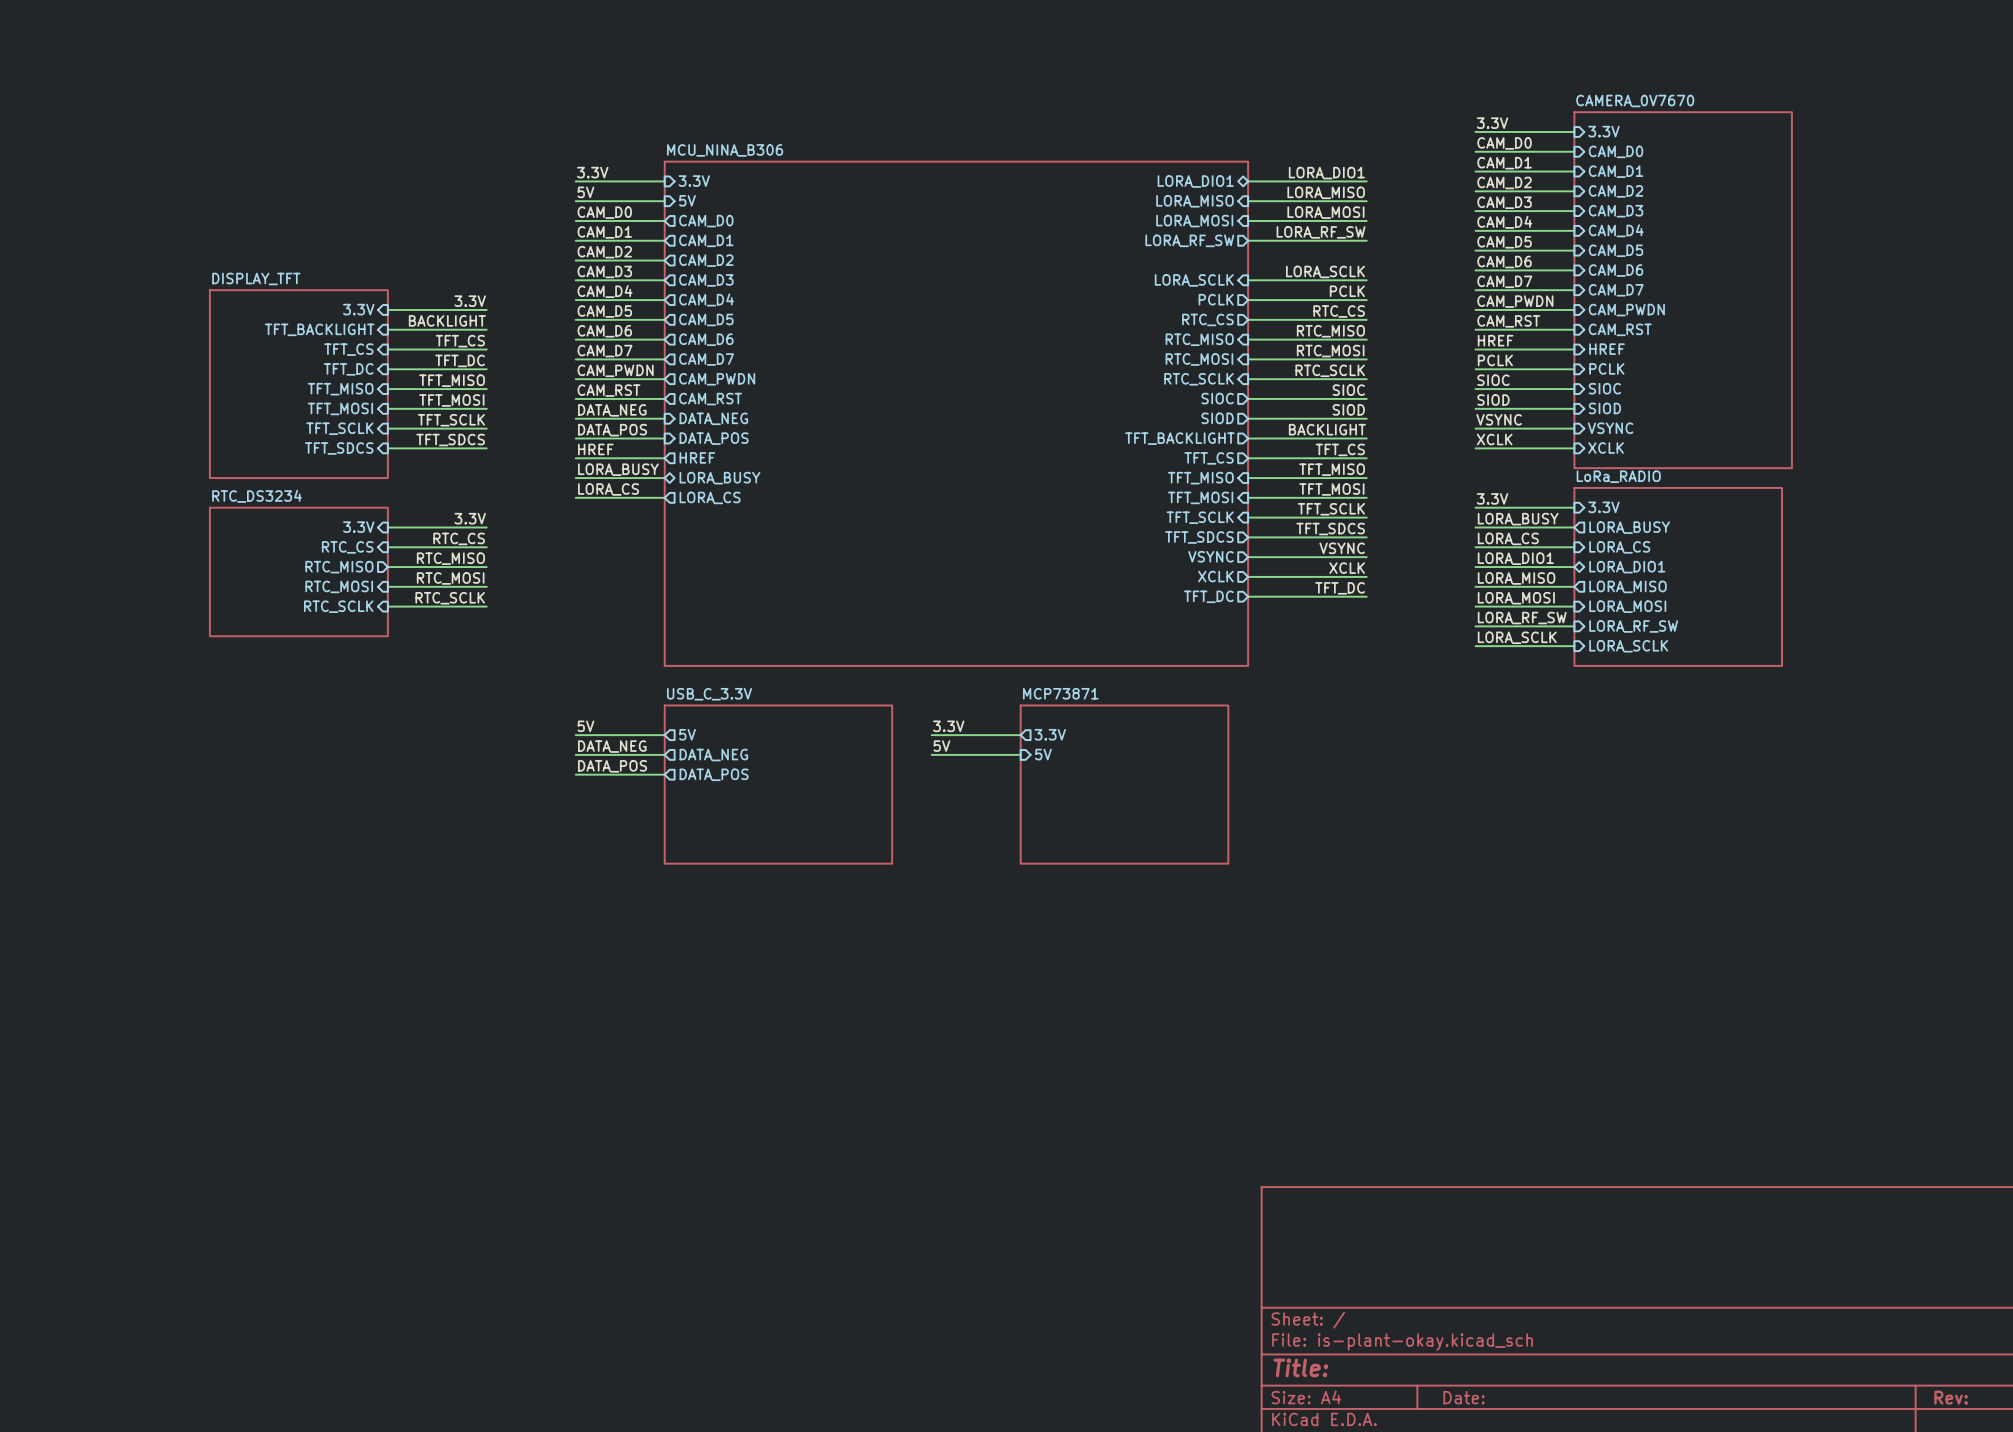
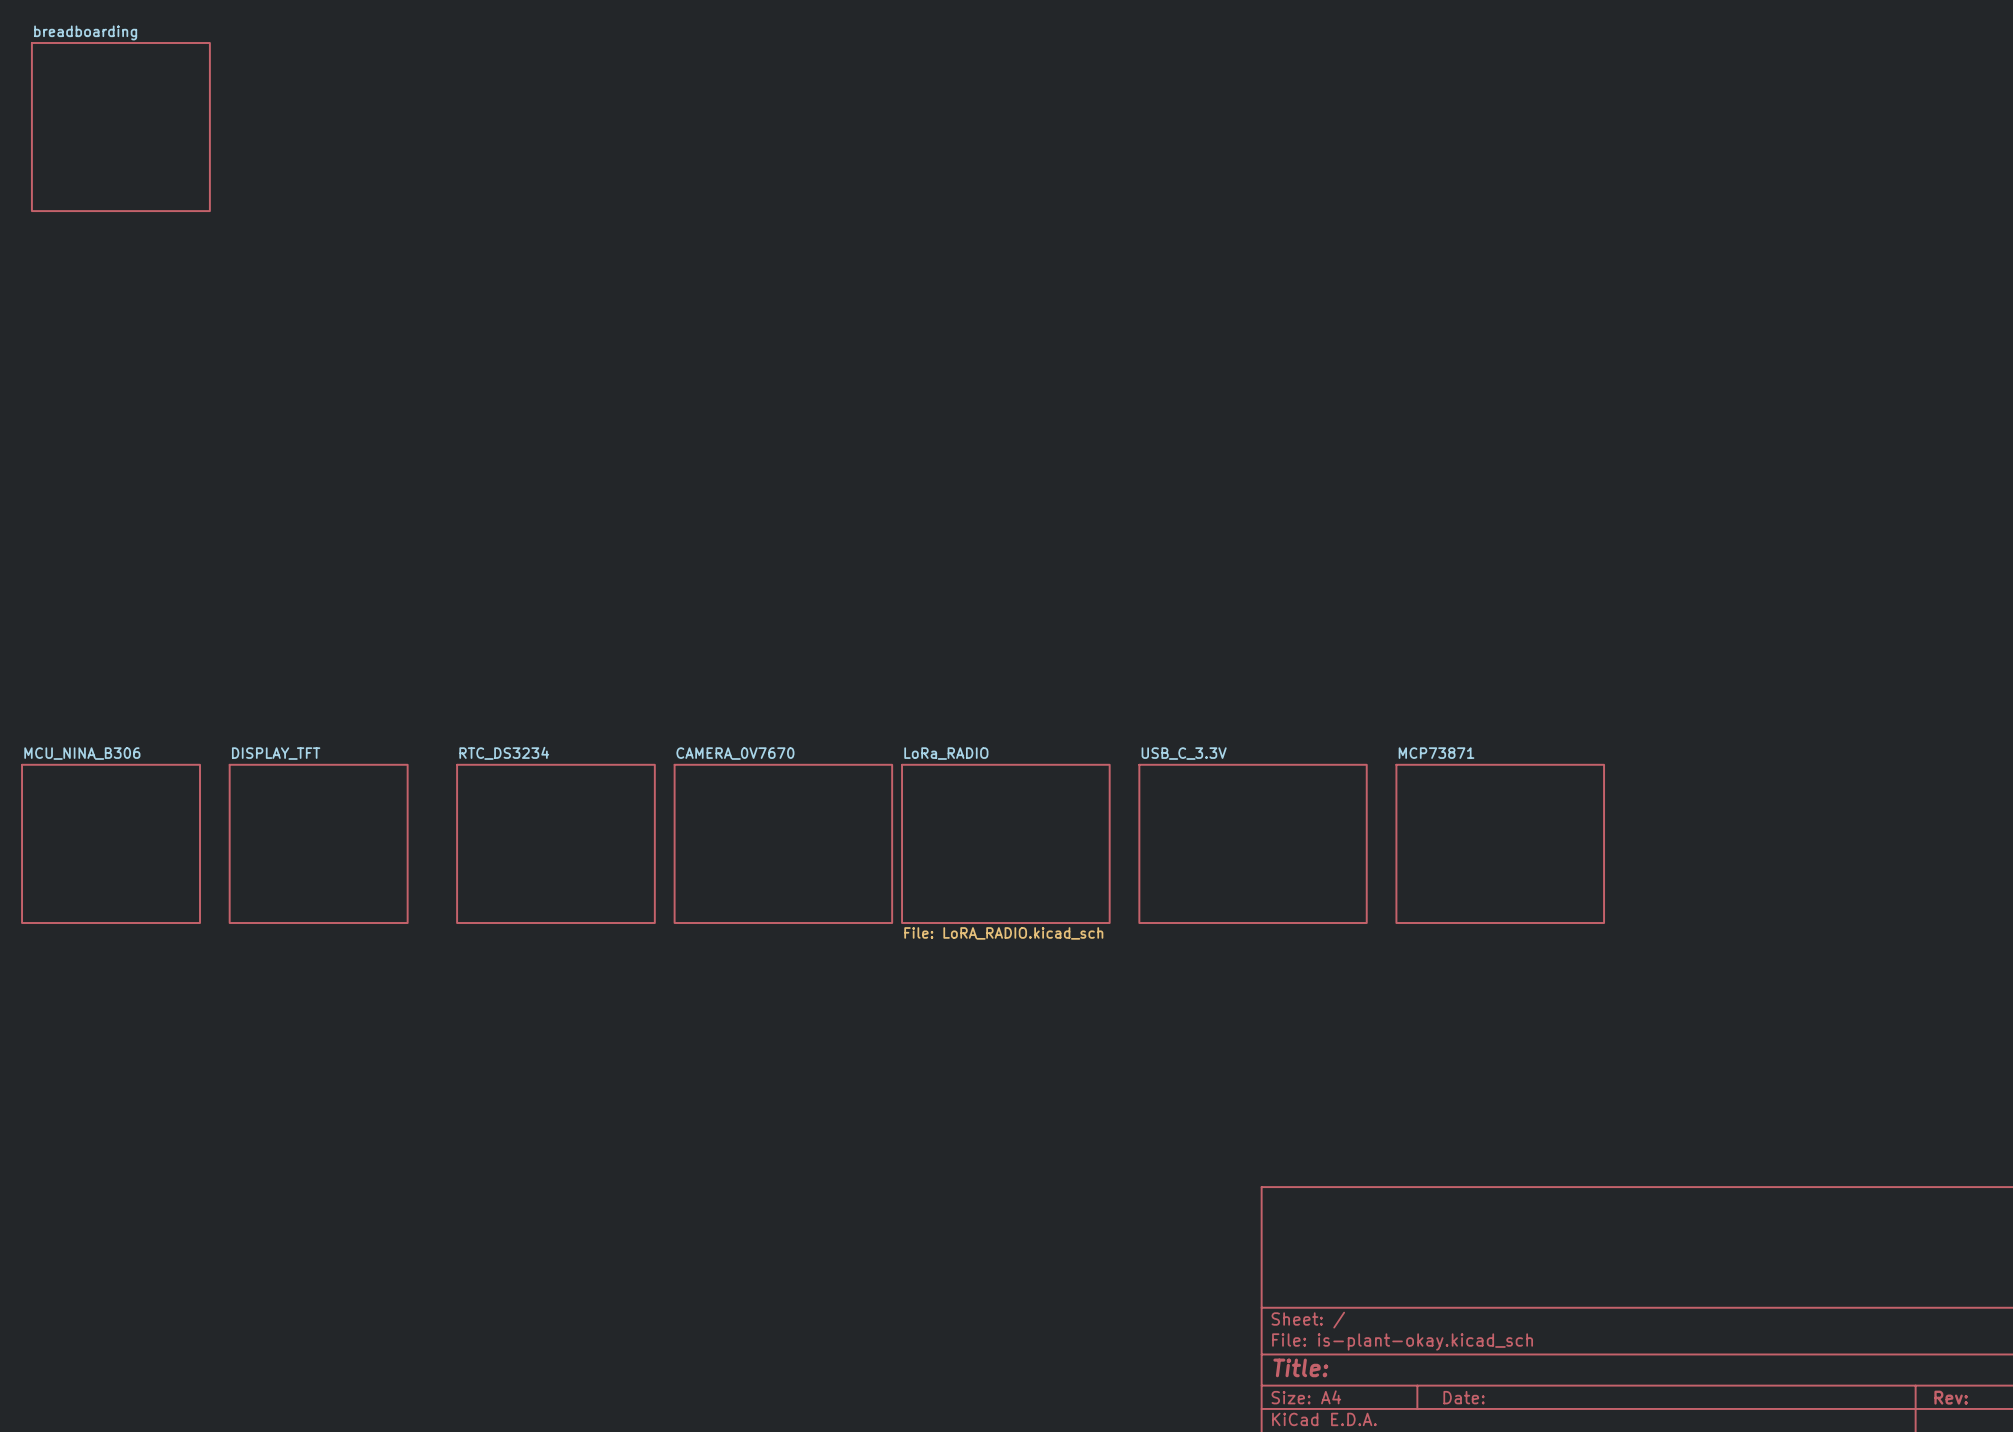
sheet CAMERA_0V7670 name position: CAMERA_0V7670 (1635, 100) -> CAMERA_0V7670 (735, 753)
sheet CAMERA_0V7670 shape: [1573, 111, 1793, 469] -> [674, 764, 893, 924]
label: 3.3V (1492, 123) -> none
sheet breadboarding: none -> (120, 127)
wire: (1475, 131) (1574, 131) -> none
sheet pin: 3.3V (1603, 131) -> none
label: CAM_D0 (1504, 143) -> none
sheet MCU_NINA_B306 name position: MCU_NINA_B306 (725, 150) -> MCU_NINA_B306 (82, 753)
wire: (1475, 151) (1574, 151) -> none
sheet pin: CAM_D0 (1615, 151) -> none
sheet MCU_NINA_B306 shape: [664, 161, 1249, 667] -> [21, 764, 201, 924]
label: CAM_D1 (1504, 163) -> none
wire: (1475, 171) (1574, 171) -> none
sheet pin: CAM_D1 (1615, 171) -> none
label: 3.3V (592, 172) -> none
label: LORA_DIO1 (1326, 173) -> none
wire: (575, 181) (664, 181) -> none
sheet pin: 3.3V (694, 181) -> none
sheet pin: LORA_DIO1 (1195, 181) -> none
wire: (1248, 181) (1366, 181) -> none
label: CAM_D2 (1504, 182) -> none
wire: (1475, 191) (1574, 191) -> none
sheet pin: CAM_D2 (1615, 191) -> none
label: 5V (585, 192) -> none
label: LORA_MISO (1326, 192) -> none
sheet pin: 5V (687, 200) -> none
wire: (575, 201) (664, 201) -> none
sheet pin: LORA_MISO (1194, 201) -> none
wire: (1248, 201) (1366, 201) -> none
label: CAM_D3 (1504, 202) -> none
wire: (1475, 211) (1574, 211) -> none
sheet pin: CAM_D3 (1615, 211) -> none
label: CAM_D0 (604, 212) -> none
label: LORA_MOSI (1325, 212) -> none
wire: (575, 220) (664, 220) -> none
wire: (1248, 220) (1366, 220) -> none
sheet pin: CAM_D0 (706, 221) -> none
sheet pin: LORA_MOSI (1194, 221) -> none
label: CAM_D4 (1504, 222) -> none
wire: (1475, 230) (1574, 230) -> none
sheet pin: CAM_D4 (1616, 230) -> none
label: CAM_D1 (604, 232) -> none
label: LORA_RF_SW (1321, 232) -> none
wire: (575, 240) (664, 240) -> none
sheet pin: CAM_D1 (706, 240) -> none
sheet pin: LORA_RF_SW (1189, 240) -> none
wire: (1248, 240) (1366, 240) -> none
label: CAM_D5 (1504, 242) -> none
wire: (1475, 250) (1574, 250) -> none
sheet pin: CAM_D5 (1615, 250) -> none
label: CAM_D2 (604, 252) -> none
wire: (575, 260) (664, 260) -> none
sheet pin: CAM_D2 (706, 260) -> none
label: CAM_D6 (1504, 262) -> none
wire: (1475, 270) (1574, 270) -> none
sheet pin: CAM_D6 (1615, 270) -> none
label: CAM_D3 (604, 271) -> none
label: LORA_SCLK (1325, 271) -> none
wire: (575, 280) (664, 280) -> none
sheet pin: CAM_D3 (706, 280) -> none
sheet pin: LORA_SCLK (1194, 280) -> none
wire: (1248, 280) (1366, 280) -> none
label: CAM_D7 (1504, 281) -> none
wire: (1475, 290) (1574, 290) -> none
sheet pin: CAM_D7 (1616, 290) -> none
label: CAM_D4 (605, 291) -> none
label: PCLK (1347, 291) -> none
sheet pin: CAM_D4 (706, 299) -> none
sheet pin: PCLK (1216, 299) -> none
wire: (575, 300) (664, 300) -> none
wire: (1248, 300) (1366, 300) -> none
label: 3.3V (470, 301) -> none
label: CAM_PWDN (1515, 301) -> none
sheet pin: 3.3V (358, 309) -> none
wire: (387, 309) (486, 309) -> none
wire: (1475, 309) (1574, 309) -> none
sheet pin: CAM_PWDN (1626, 310) -> none
label: CAM_D5 (604, 311) -> none
label: RTC_CS (1339, 311) -> none
wire: (575, 319) (664, 319) -> none
sheet pin: CAM_D5 (706, 319) -> none
sheet pin: RTC_CS (1207, 319) -> none
wire: (1248, 319) (1366, 319) -> none
label: BACKLIGHT (447, 320) -> none
label: CAM_RST (1508, 321) -> none
sheet pin: TFT_BACKLIGHT (319, 329) -> none
wire: (387, 329) (486, 329) -> none
wire: (1475, 329) (1574, 329) -> none
sheet pin: CAM_RST (1620, 329) -> none
label: CAM_D6 (604, 331) -> none
label: RTC_MISO (1330, 331) -> none
wire: (575, 339) (664, 339) -> none
sheet pin: CAM_D6 (706, 339) -> none
sheet pin: RTC_MISO (1199, 339) -> none
wire: (1248, 339) (1366, 339) -> none
label: HREF (1495, 340) -> none
label: TFT_CS (460, 341) -> none
sheet pin: TFT_CS (348, 349) -> none
wire: (387, 349) (486, 349) -> none
wire: (1475, 349) (1574, 349) -> none
sheet pin: HREF (1607, 349) -> none
label: CAM_D7 (605, 351) -> none
label: RTC_MOSI (1330, 351) -> none
wire: (575, 359) (664, 359) -> none
sheet pin: CAM_D7 (706, 359) -> none
sheet pin: RTC_MOSI (1199, 359) -> none
wire: (1248, 359) (1366, 359) -> none
label: TFT_DC (460, 360) -> none
label: PCLK (1495, 360) -> none
sheet pin: PCLK (1606, 368) -> none
sheet pin: TFT_DC (348, 369) -> none
wire: (387, 369) (486, 369) -> none
wire: (1475, 369) (1574, 369) -> none
label: CAM_PWDN (615, 370) -> none
label: RTC_SCLK (1330, 370) -> none
wire: (575, 379) (664, 379) -> none
sheet pin: CAM_PWDN (717, 379) -> none
sheet pin: RTC_SCLK (1198, 379) -> none
wire: (1248, 379) (1366, 379) -> none
label: TFT_MISO (452, 380) -> none
label: SIOC (1493, 380) -> none
sheet DISPLAY_TFT: (298, 384) -> none
sheet pin: SIOC (1604, 388) -> none
sheet pin: TFT_MISO (340, 389) -> none
wire: (387, 389) (486, 389) -> none
wire: (1475, 389) (1574, 389) -> none
label: CAM_RST (609, 390) -> none
label: SIOC (1348, 390) -> none
wire: (575, 398) (664, 398) -> none
sheet pin: SIOC (1217, 398) -> none
wire: (1248, 398) (1366, 398) -> none
sheet pin: CAM_RST (710, 399) -> none
label: TFT_MOSI (451, 400) -> none
label: SIOD (1493, 400) -> none
sheet pin: TFT_MOSI (340, 408) -> none
wire: (387, 408) (486, 408) -> none
wire: (1475, 408) (1574, 408) -> none
sheet pin: SIOD (1604, 408) -> none
label: SIOD (1348, 409) -> none
label: DATA_NEG (612, 410) -> none
wire: (575, 418) (664, 418) -> none
sheet pin: DATA_NEG (713, 418) -> none
sheet pin: SIOD (1217, 418) -> none
wire: (1248, 418) (1366, 418) -> none
label: VSYNC (1499, 419) -> none
label: TFT_SCLK (451, 420) -> none
sheet pin: TFT_SCLK (339, 428) -> none
wire: (387, 428) (486, 428) -> none
wire: (1475, 428) (1574, 428) -> none
sheet pin: VSYNC (1610, 428) -> none
label: BACKLIGHT (1327, 429) -> none
label: DATA_POS (612, 430) -> none
wire: (575, 438) (664, 438) -> none
sheet pin: DATA_POS (714, 438) -> none
sheet pin: TFT_BACKLIGHT (1179, 438) -> none
wire: (1248, 438) (1366, 438) -> none
label: XCLK (1494, 439) -> none
label: TFT_SDCS (450, 440) -> none
sheet pin: TFT_SDCS (339, 448) -> none
wire: (387, 448) (486, 448) -> none
wire: (1475, 448) (1574, 448) -> none
sheet pin: XCLK (1606, 448) -> none
label: HREF (595, 449) -> none
label: TFT_CS (1340, 449) -> none
sheet pin: HREF (697, 457) -> none
wire: (575, 458) (664, 458) -> none
sheet pin: TFT_CS (1209, 458) -> none
wire: (1248, 458) (1366, 458) -> none
label: LORA_BUSY (618, 469) -> none
label: TFT_MISO (1332, 469) -> none
wire: (575, 478) (664, 478) -> none
sheet pin: LORA_BUSY (719, 478) -> none
sheet pin: TFT_MISO (1200, 478) -> none
wire: (1248, 478) (1366, 478) -> none
label: LORA_CS (608, 489) -> none
label: TFT_MOSI (1331, 489) -> none
sheet RTC_DS3234 name position: RTC_DS3234 (257, 496) -> RTC_DS3234 (504, 753)
wire: (575, 497) (664, 497) -> none
sheet pin: LORA_CS (710, 497) -> none
sheet pin: TFT_MOSI (1200, 497) -> none
wire: (1248, 497) (1366, 497) -> none
label: 3.3V (1492, 498) -> none
sheet RTC_DS3234 shape: [209, 507, 389, 637] -> [456, 764, 656, 924]
wire: (1475, 507) (1574, 507) -> none
sheet pin: 3.3V (1603, 507) -> none
label: TFT_SCLK (1331, 509) -> none
sheet pin: TFT_SCLK (1200, 517) -> none
wire: (1248, 517) (1366, 517) -> none
label: 3.3V (470, 518) -> none
label: LORA_BUSY (1518, 519) -> none
sheet pin: 3.3V (358, 527) -> none
wire: (387, 527) (486, 527) -> none
wire: (1475, 527) (1574, 527) -> none
sheet pin: LORA_BUSY (1629, 527) -> none
label: TFT_SDCS (1330, 529) -> none
sheet pin: TFT_SDCS (1199, 537) -> none
wire: (1248, 537) (1366, 537) -> none
label: RTC_CS (459, 538) -> none
label: LORA_CS (1508, 538) -> none
sheet pin: RTC_CS (347, 547) -> none
wire: (387, 547) (486, 547) -> none
wire: (1475, 547) (1574, 547) -> none
sheet pin: LORA_CS (1619, 547) -> none
label: VSYNC (1342, 548) -> none
sheet pin: VSYNC (1210, 556) -> none
wire: (1248, 557) (1366, 557) -> none
label: RTC_MISO (450, 558) -> none
label: LORA_DIO1 (1515, 558) -> none
sheet pin: RTC_MISO (339, 567) -> none
wire: (387, 567) (486, 567) -> none
wire: (1475, 567) (1574, 567) -> none
sheet pin: LORA_DIO1 (1627, 567) -> none
label: XCLK (1347, 568) -> none
sheet pin: XCLK (1215, 576) -> none
wire: (1248, 576) (1366, 576) -> none
sheet LoRa_RADIO: (1678, 576) -> none
label: RTC_MOSI (450, 578) -> none
label: LORA_MISO (1516, 578) -> none
sheet pin: RTC_MOSI (339, 586) -> none
wire: (387, 586) (486, 586) -> none
wire: (1475, 586) (1574, 586) -> none
sheet pin: LORA_MISO (1627, 586) -> none
label: TFT_DC (1340, 588) -> none
sheet pin: TFT_DC (1208, 596) -> none
wire: (1248, 596) (1366, 596) -> none
label: RTC_SCLK (450, 598) -> none
label: LORA_MOSI (1516, 598) -> none
sheet pin: RTC_SCLK (338, 606) -> none
wire: (387, 606) (486, 606) -> none
wire: (1475, 606) (1574, 606) -> none
sheet pin: LORA_MOSI (1627, 606) -> none
label: LORA_RF_SW (1522, 618) -> none
wire: (1475, 626) (1574, 626) -> none
sheet pin: LORA_RF_SW (1633, 626) -> none
label: LORA_SCLK (1517, 637) -> none
wire: (1475, 646) (1574, 646) -> none
sheet pin: LORA_SCLK (1628, 646) -> none
label: 5V (585, 726) -> none
label: 3.3V (948, 726) -> none
sheet pin: 5V (687, 734) -> none
sheet pin: 3.3V (1050, 734) -> none
wire: (575, 735) (664, 735) -> none
wire: (931, 735) (1020, 735) -> none
label: DATA_NEG (612, 746) -> none
label: 5V (941, 746) -> none
wire: (575, 754) (664, 754) -> none
wire: (931, 754) (1020, 754) -> none
sheet pin: 5V (1043, 754) -> none
sheet pin: DATA_NEG (713, 755) -> none
label: DATA_POS (612, 766) -> none
wire: (575, 774) (664, 774) -> none
sheet pin: DATA_POS (714, 774) -> none
sheet USB_C_3.3V position: (778, 784) -> (1253, 843)
sheet MCP73871 position: (1124, 784) -> (1500, 843)
sheet DISPLAY_TFT: none -> (318, 843)
sheet LoRa_RADIO: none -> File: LoRA_RADIO.kicad_sch (1005, 843)

